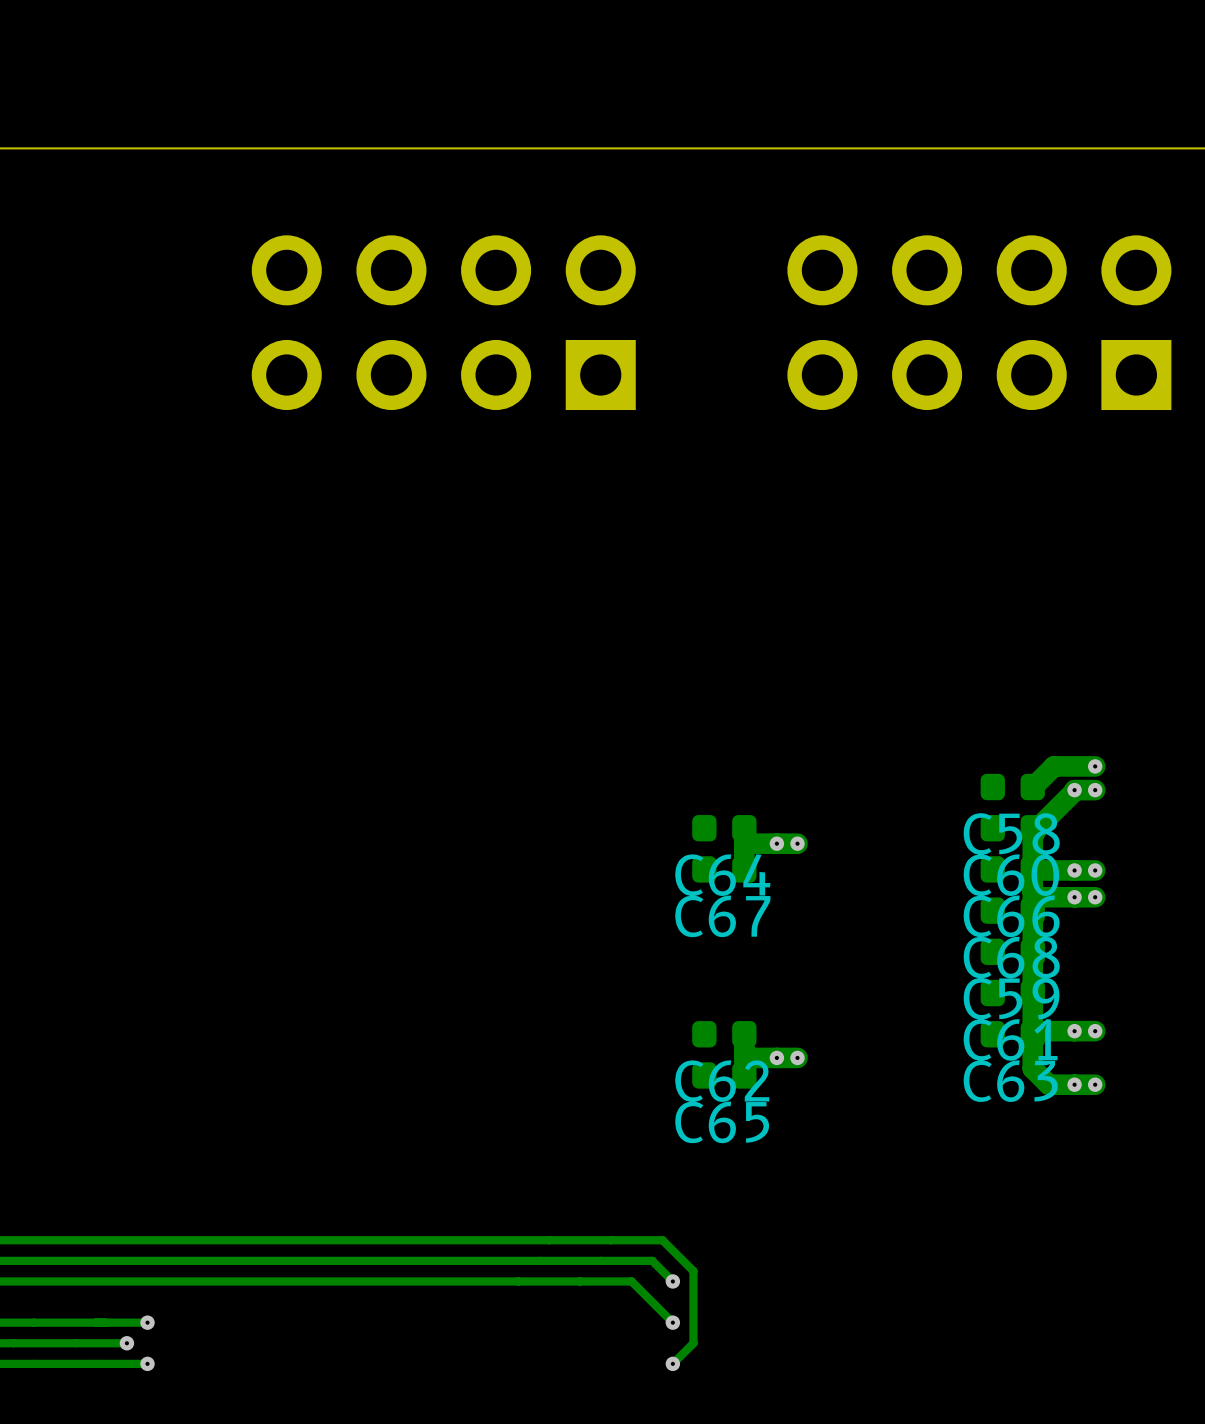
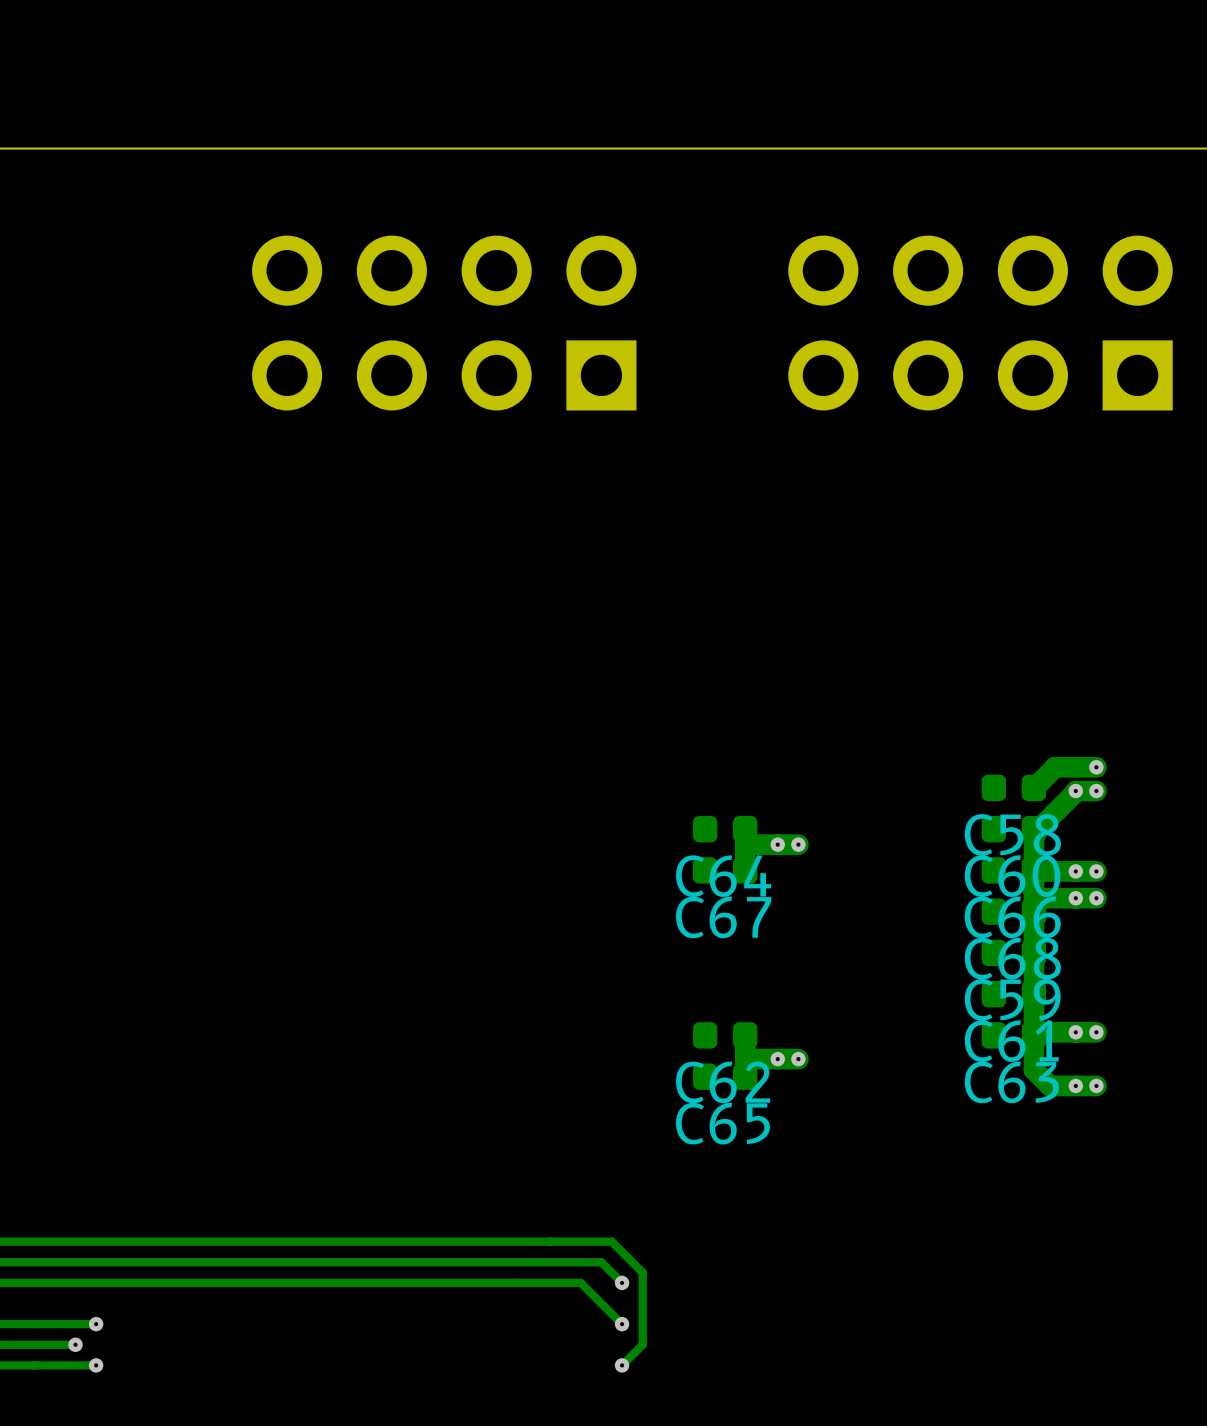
track: (611, 1240) (662, 1240) (693, 1271) (693, 1343) (672, 1363) -> (611, 1241) (642, 1272) (642, 1344) (622, 1365)
track: (600, 1260) (652, 1260) (672, 1281) -> (601, 1262) (622, 1282)
track: (580, 1281) (631, 1281) (672, 1322) -> (580, 1282) (622, 1324)
via: none -> (622, 1282)
via: (672, 1281) -> none
via: none -> (96, 1324)
track: (147, 1322) (96, 1322) -> none
via: (147, 1322) -> none
via: none -> (622, 1324)
via: (672, 1322) -> none
via: none -> (75, 1344)
track: (126, 1343) (75, 1343) -> none
via: (126, 1343) -> none
via: none -> (96, 1365)
track: (147, 1363) (96, 1363) -> none
via: (147, 1363) -> none
via: none -> (622, 1365)
via: (672, 1363) -> none

